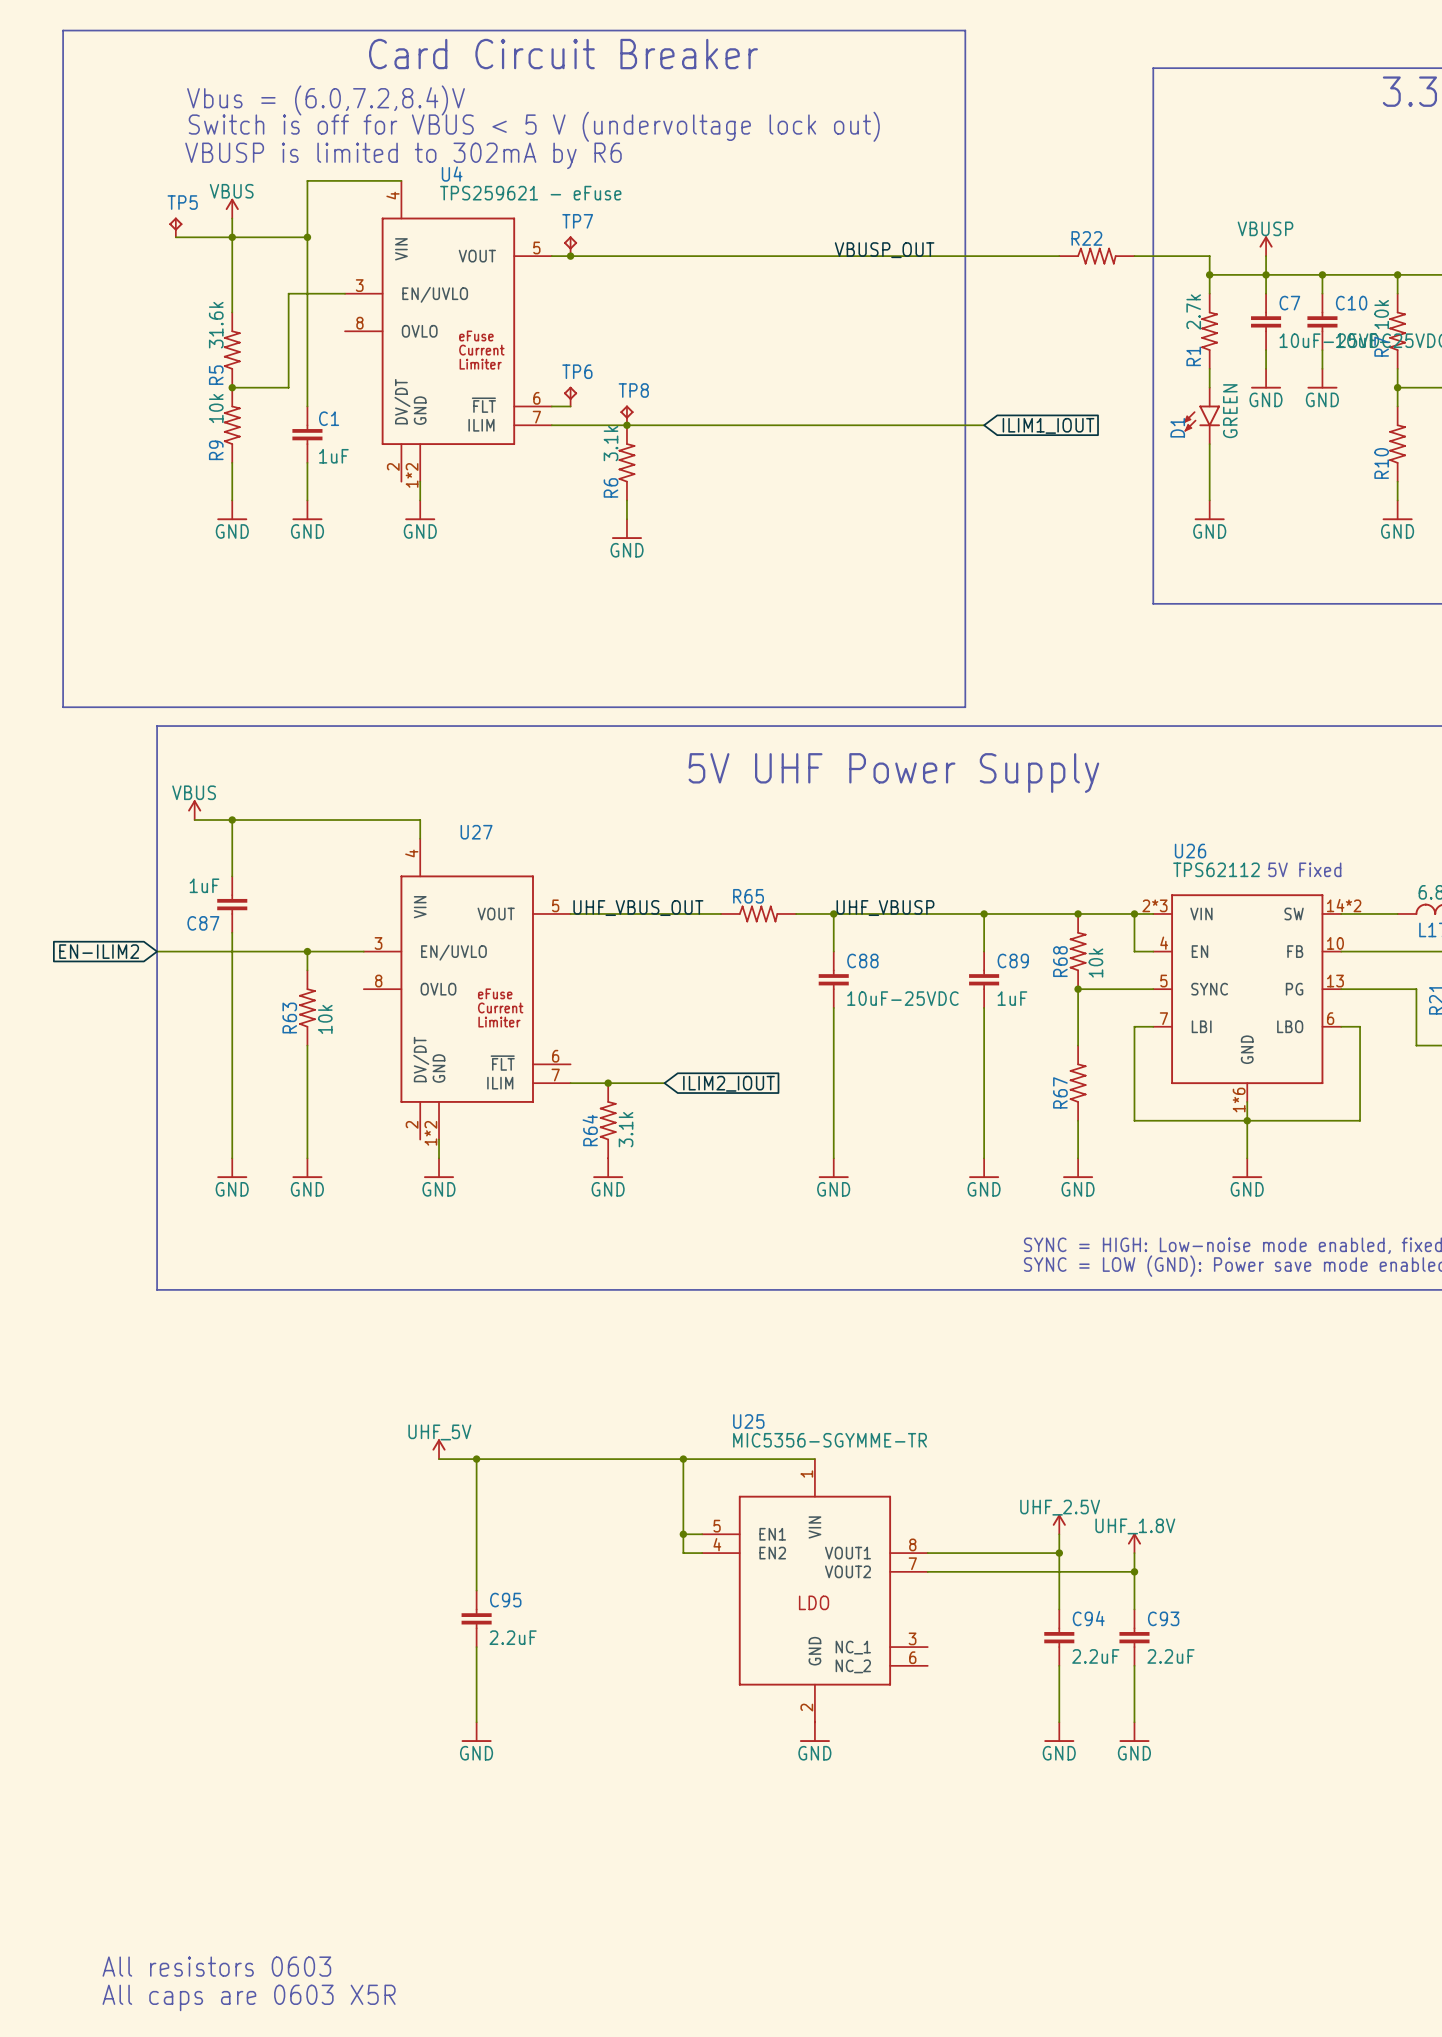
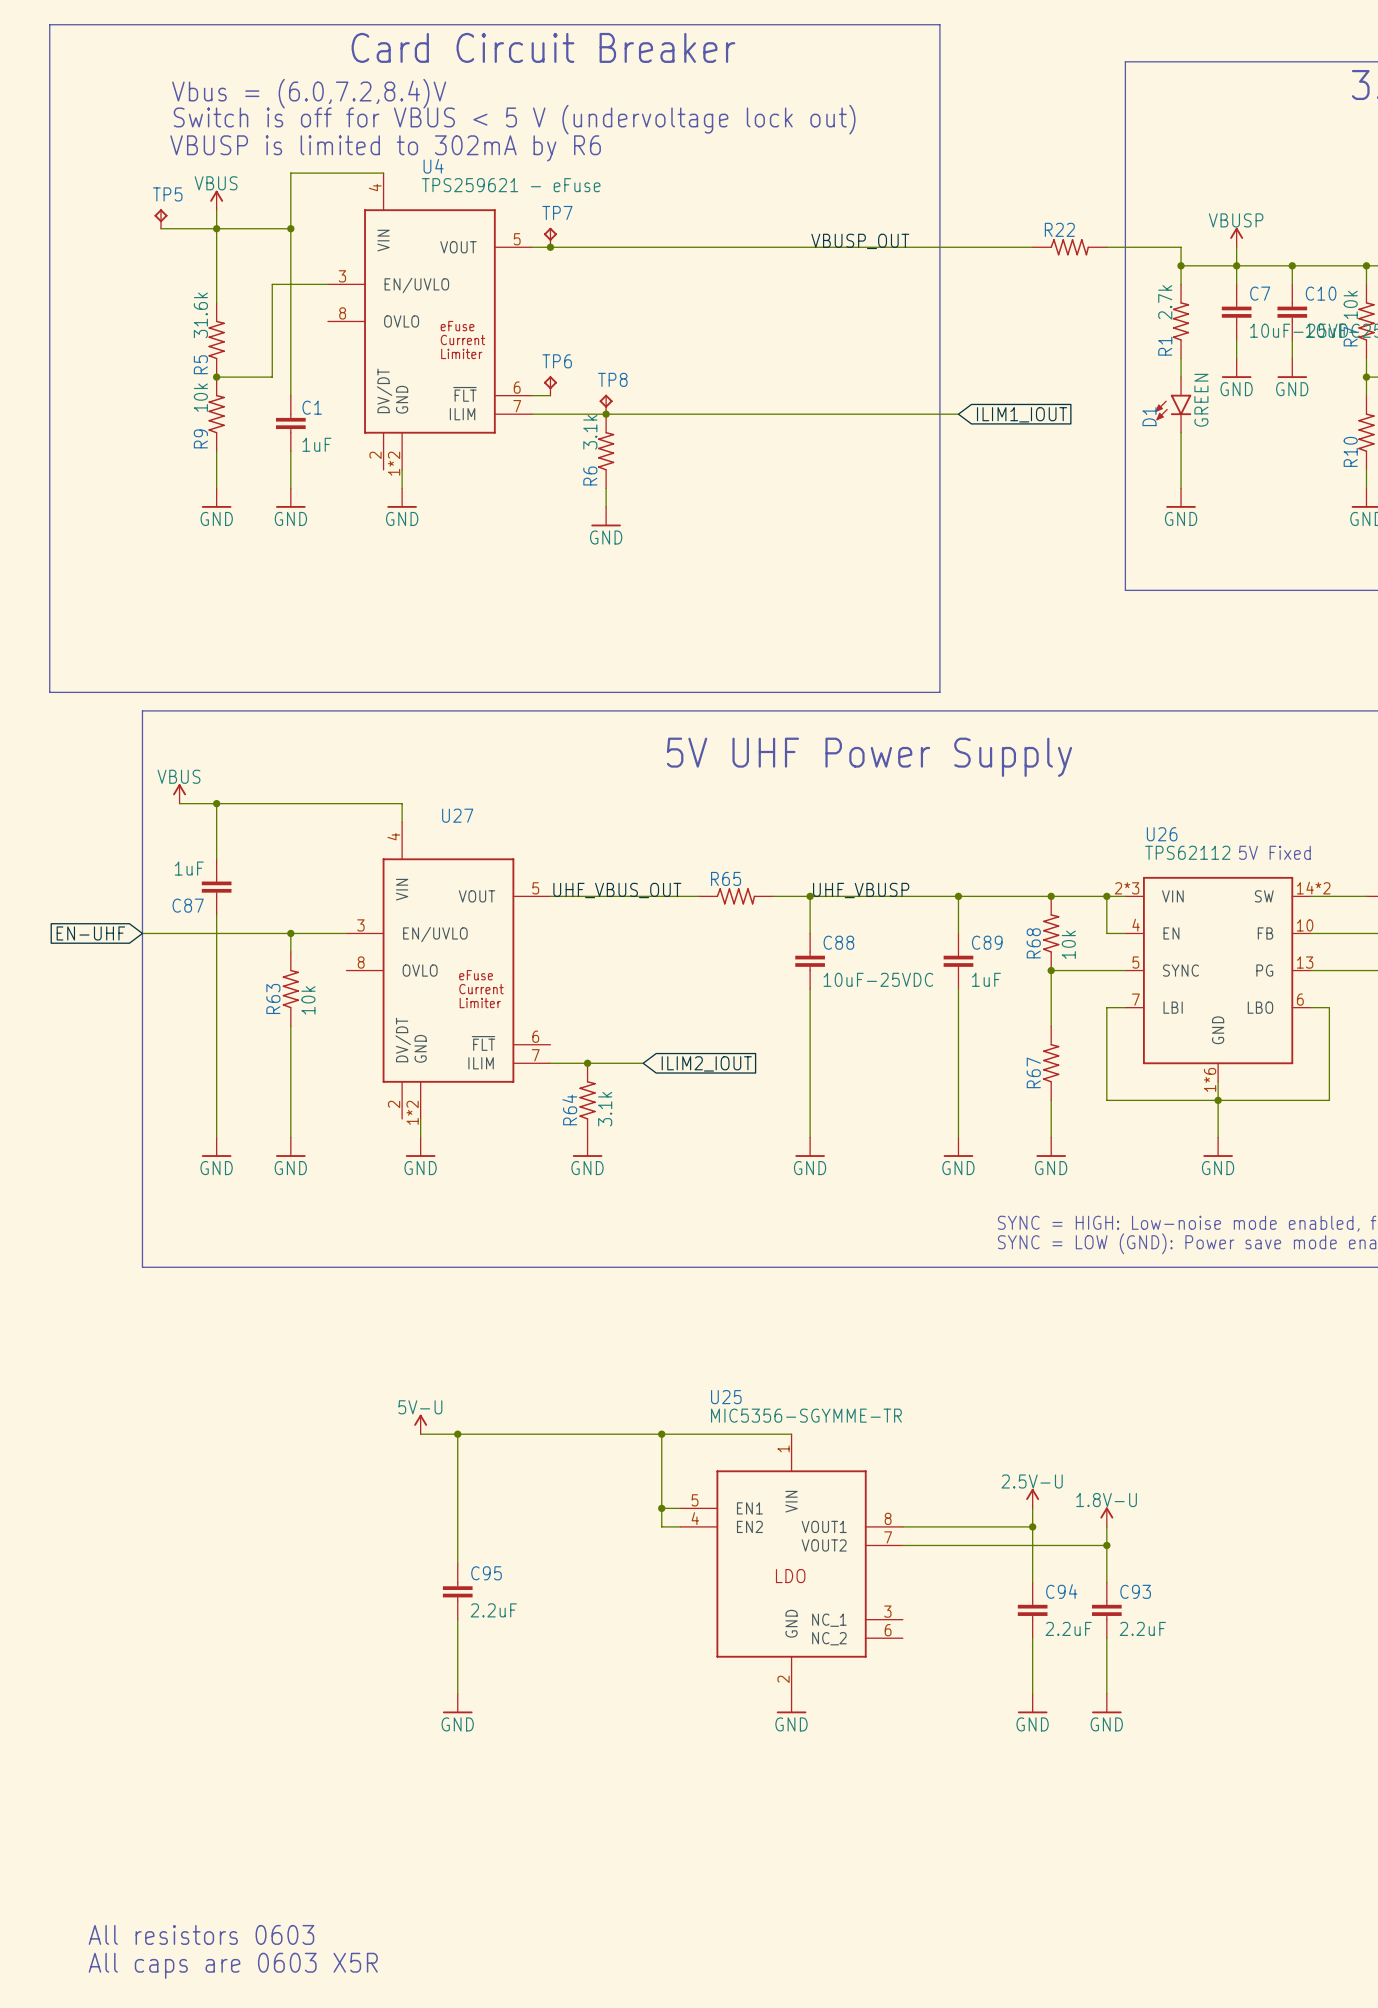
global label: EN-ILIM2 (99, 951) -> EN-UHF (90, 933)
power symbol: UHF_5V (439, 1449) -> 5V-U (420, 1424)
power symbol: UHF_2.5V (1059, 1524) -> 2.5V-U (1032, 1498)
power symbol: UHF_1.8V (1134, 1543) -> 1.8V-U (1106, 1517)

